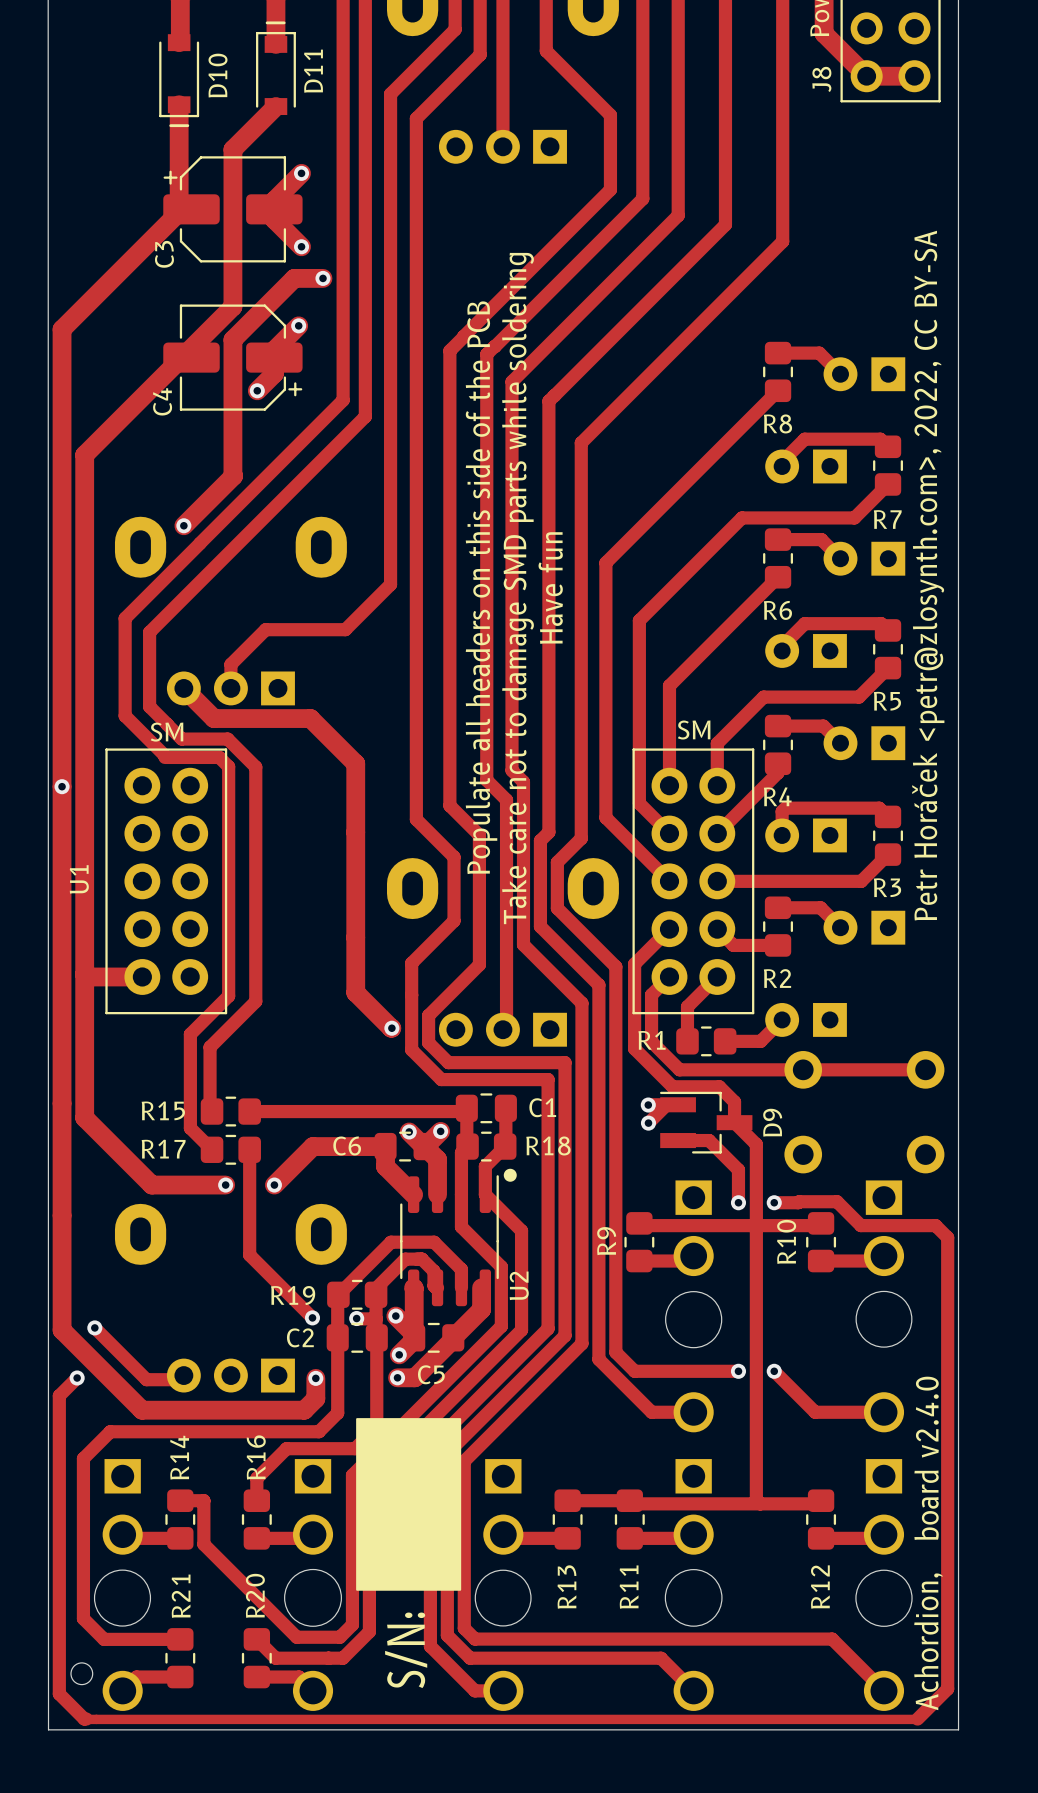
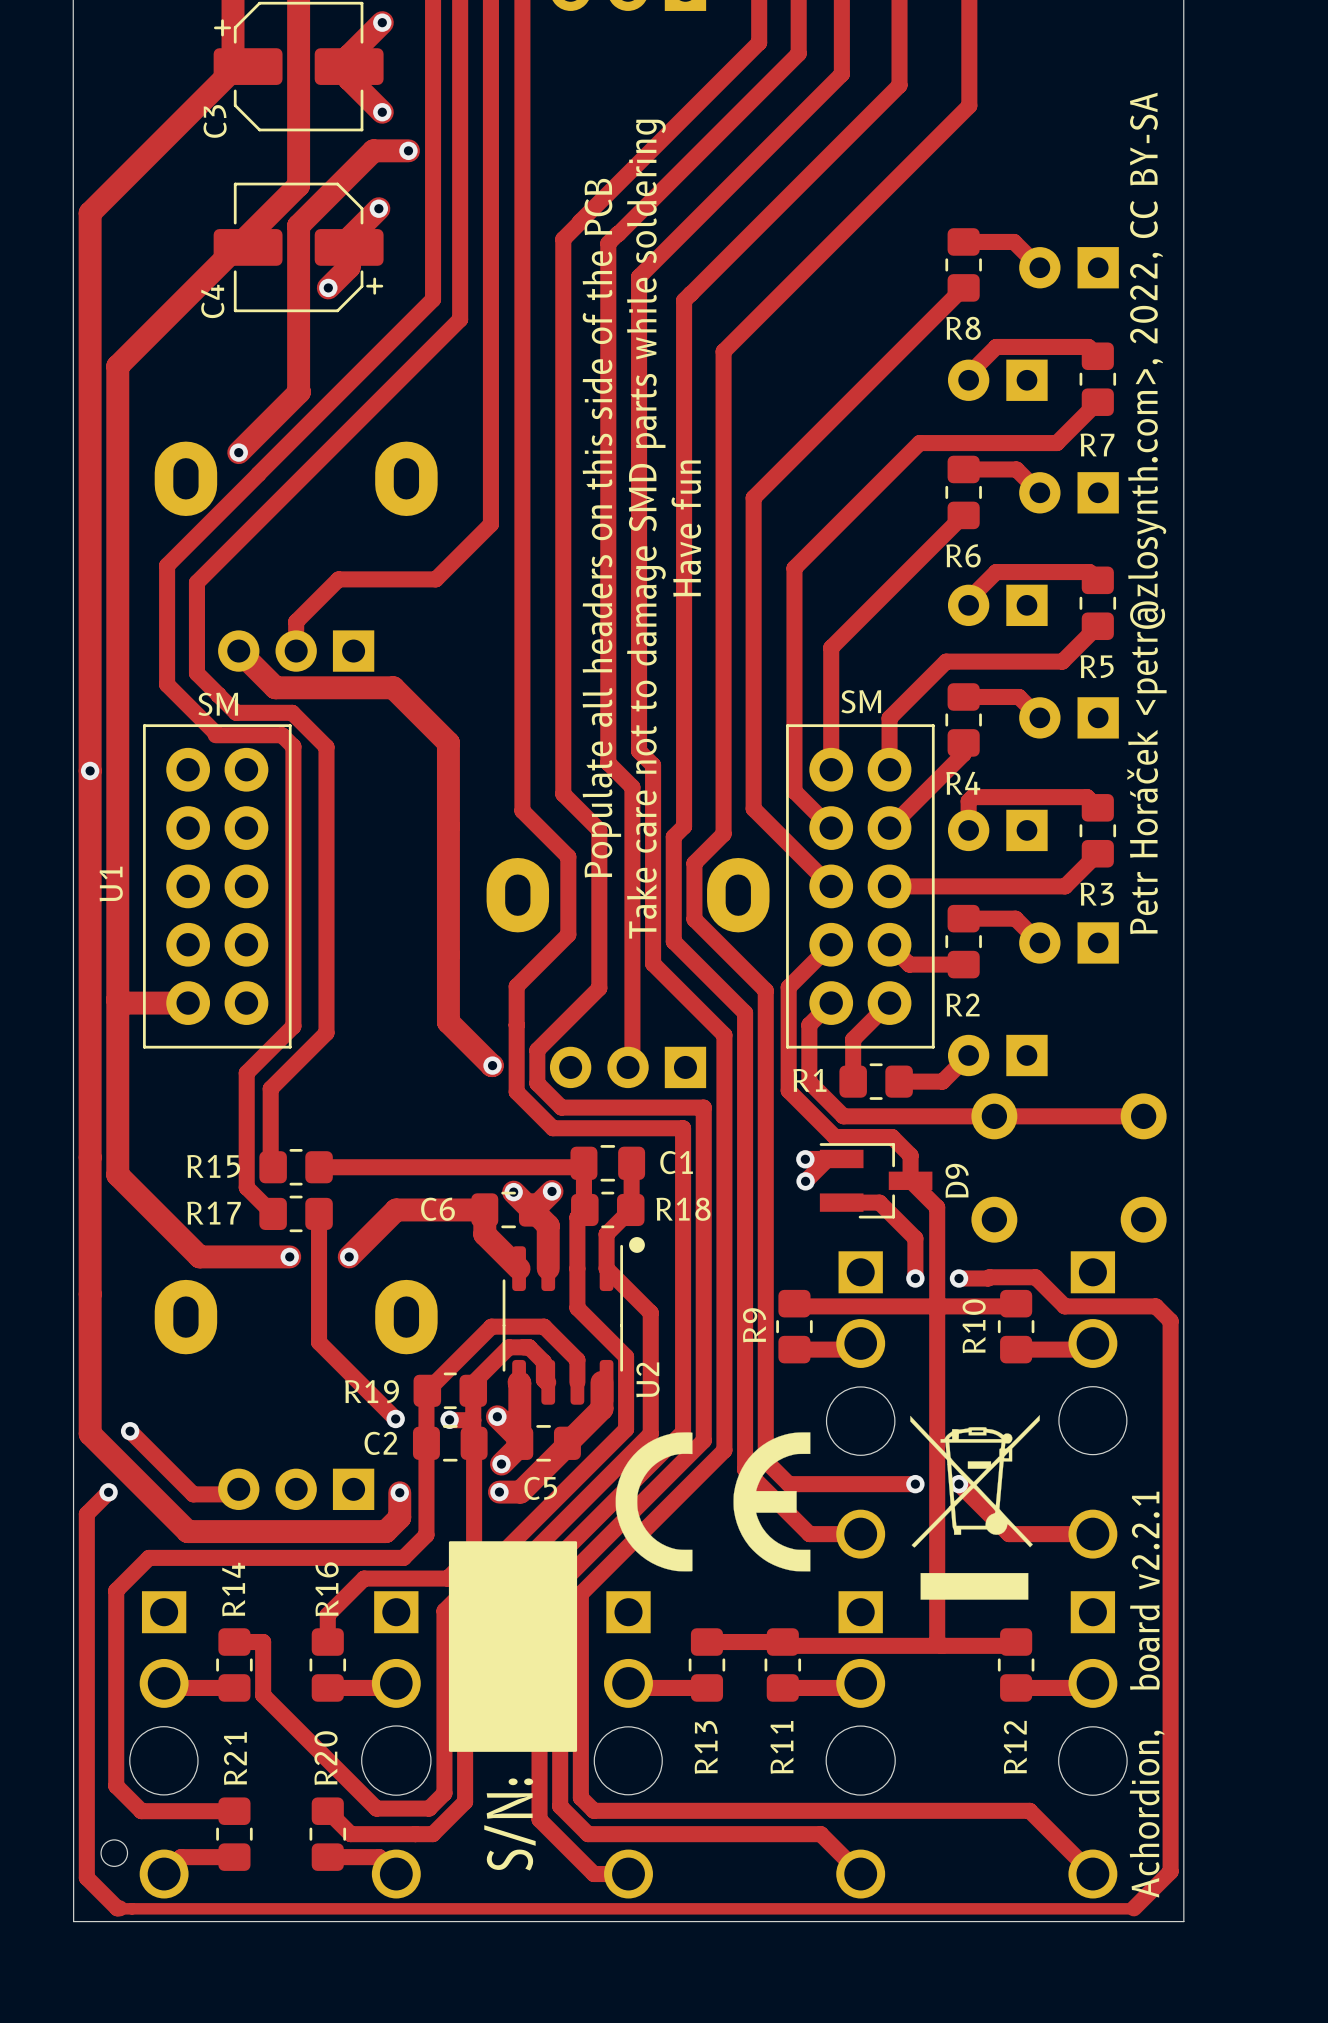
drawing: none -> [910, 1415, 1040, 1600]
drawing: none -> [615, 1432, 811, 1572]
text: board v2.4.0 (926, 1458) -> board v2.2.1 (1144, 1590)

